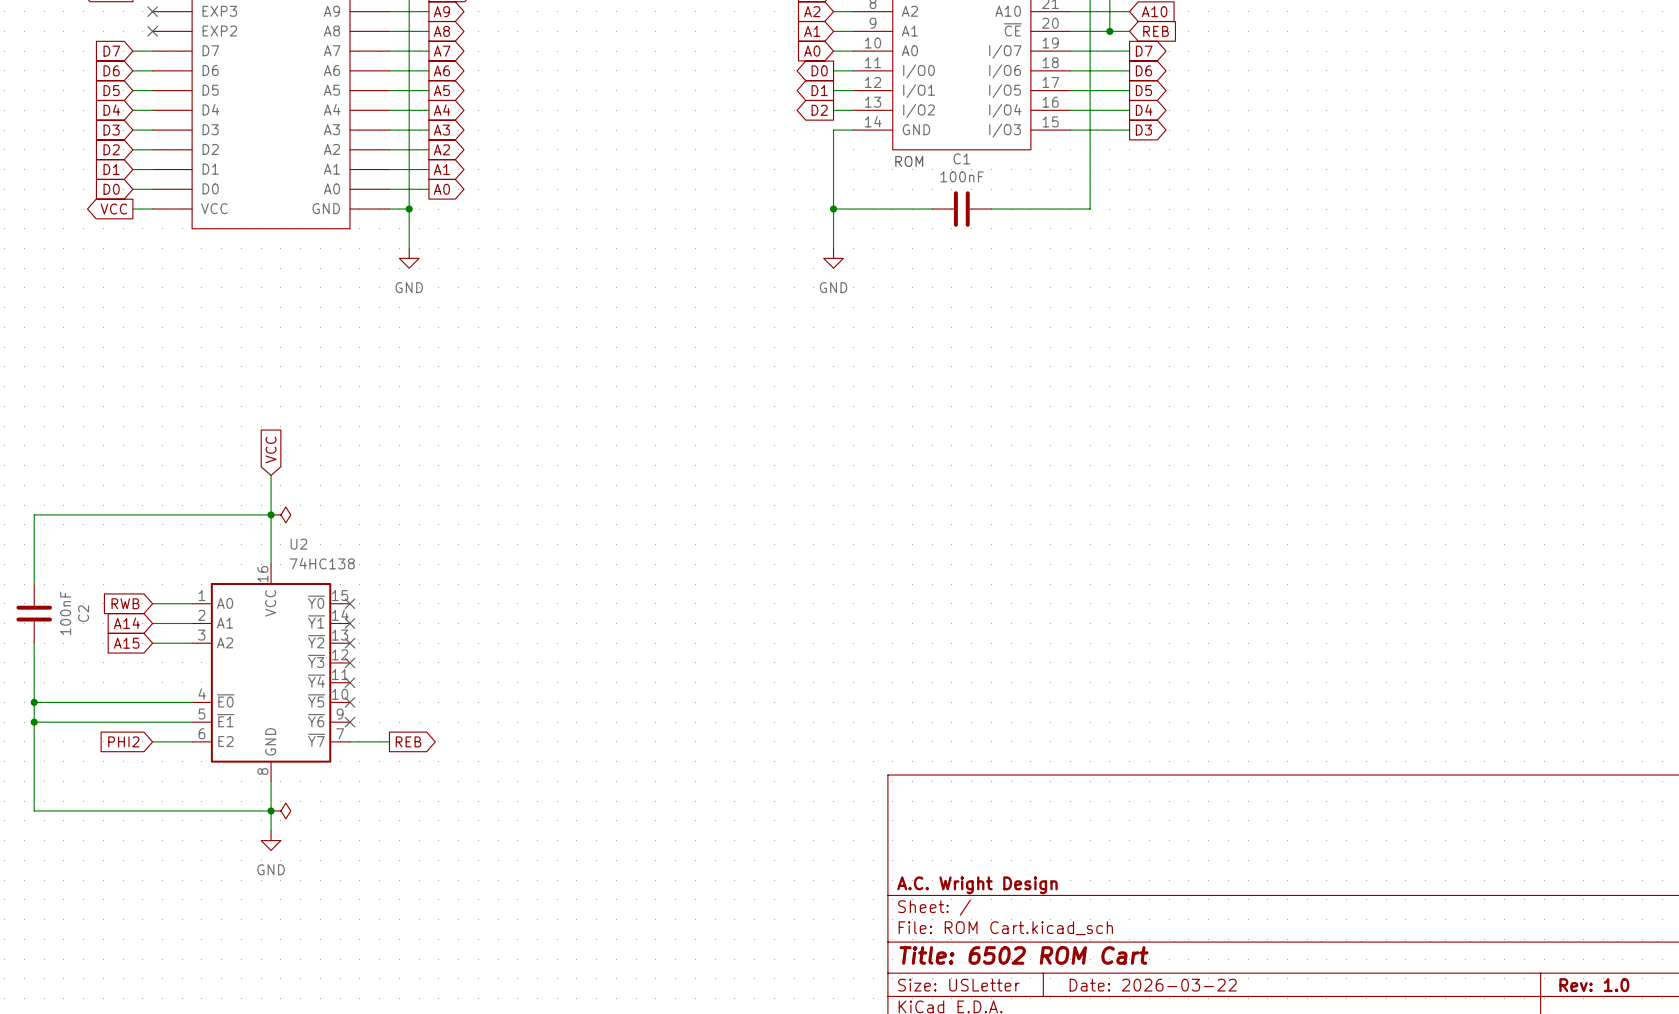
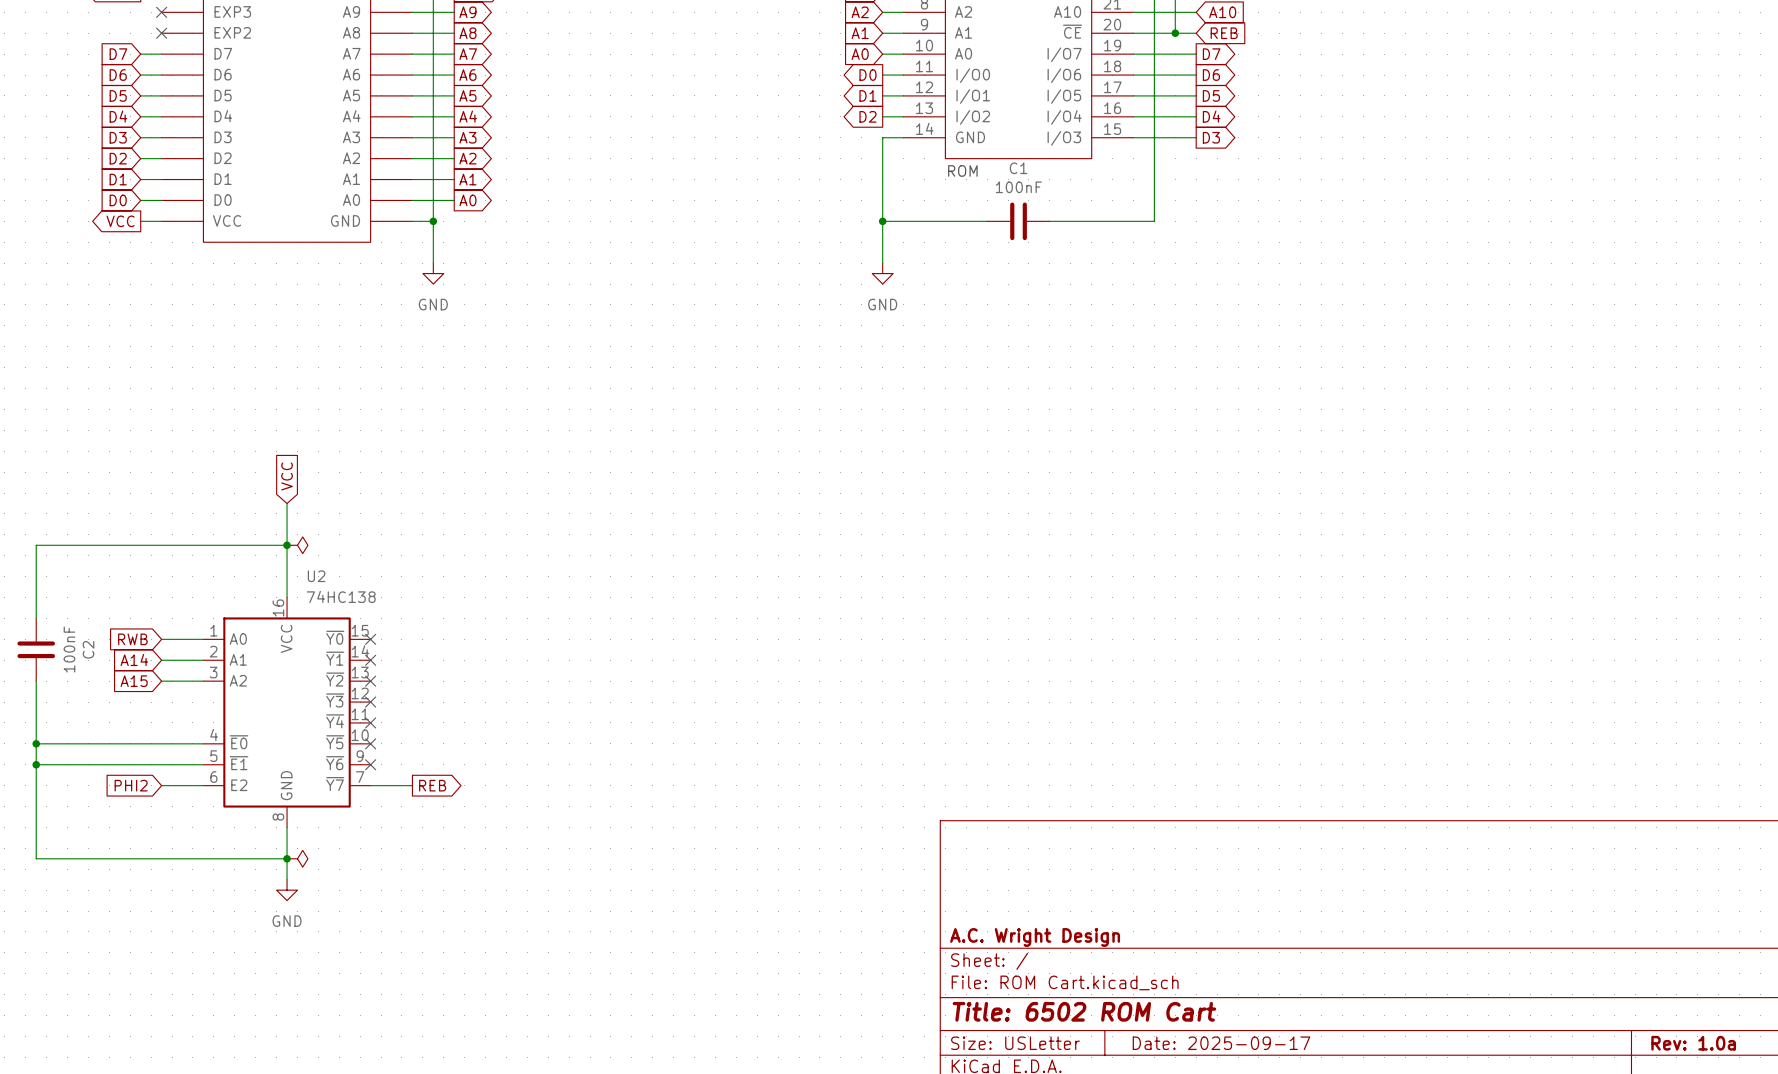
title block: Date: 2026-03-22 (1153, 985) -> Date: 2025-09-17 (1221, 1043)
title block: Rev: 1.0 (1594, 985) -> Rev: 1.0a (1693, 1043)

